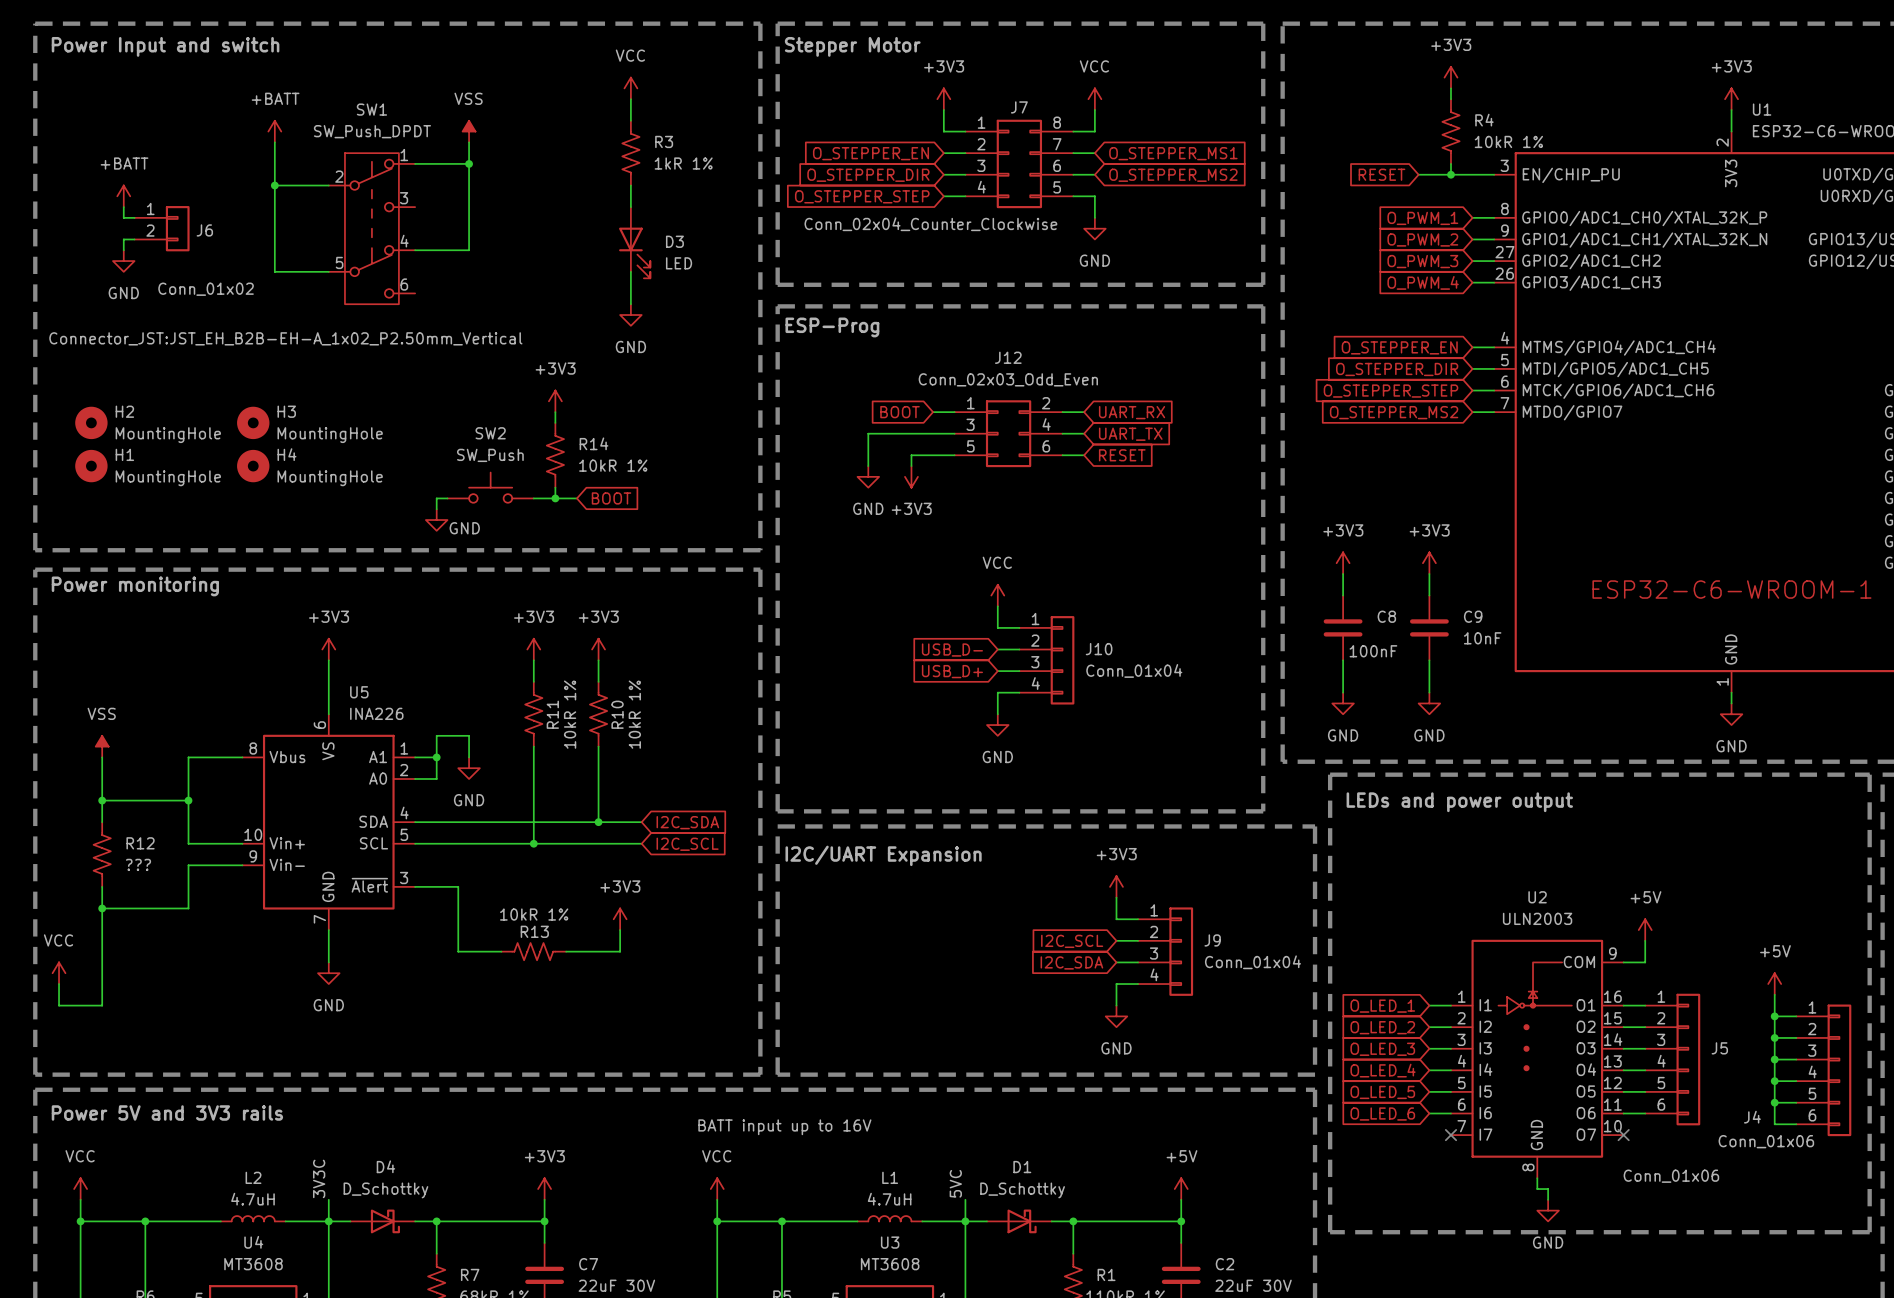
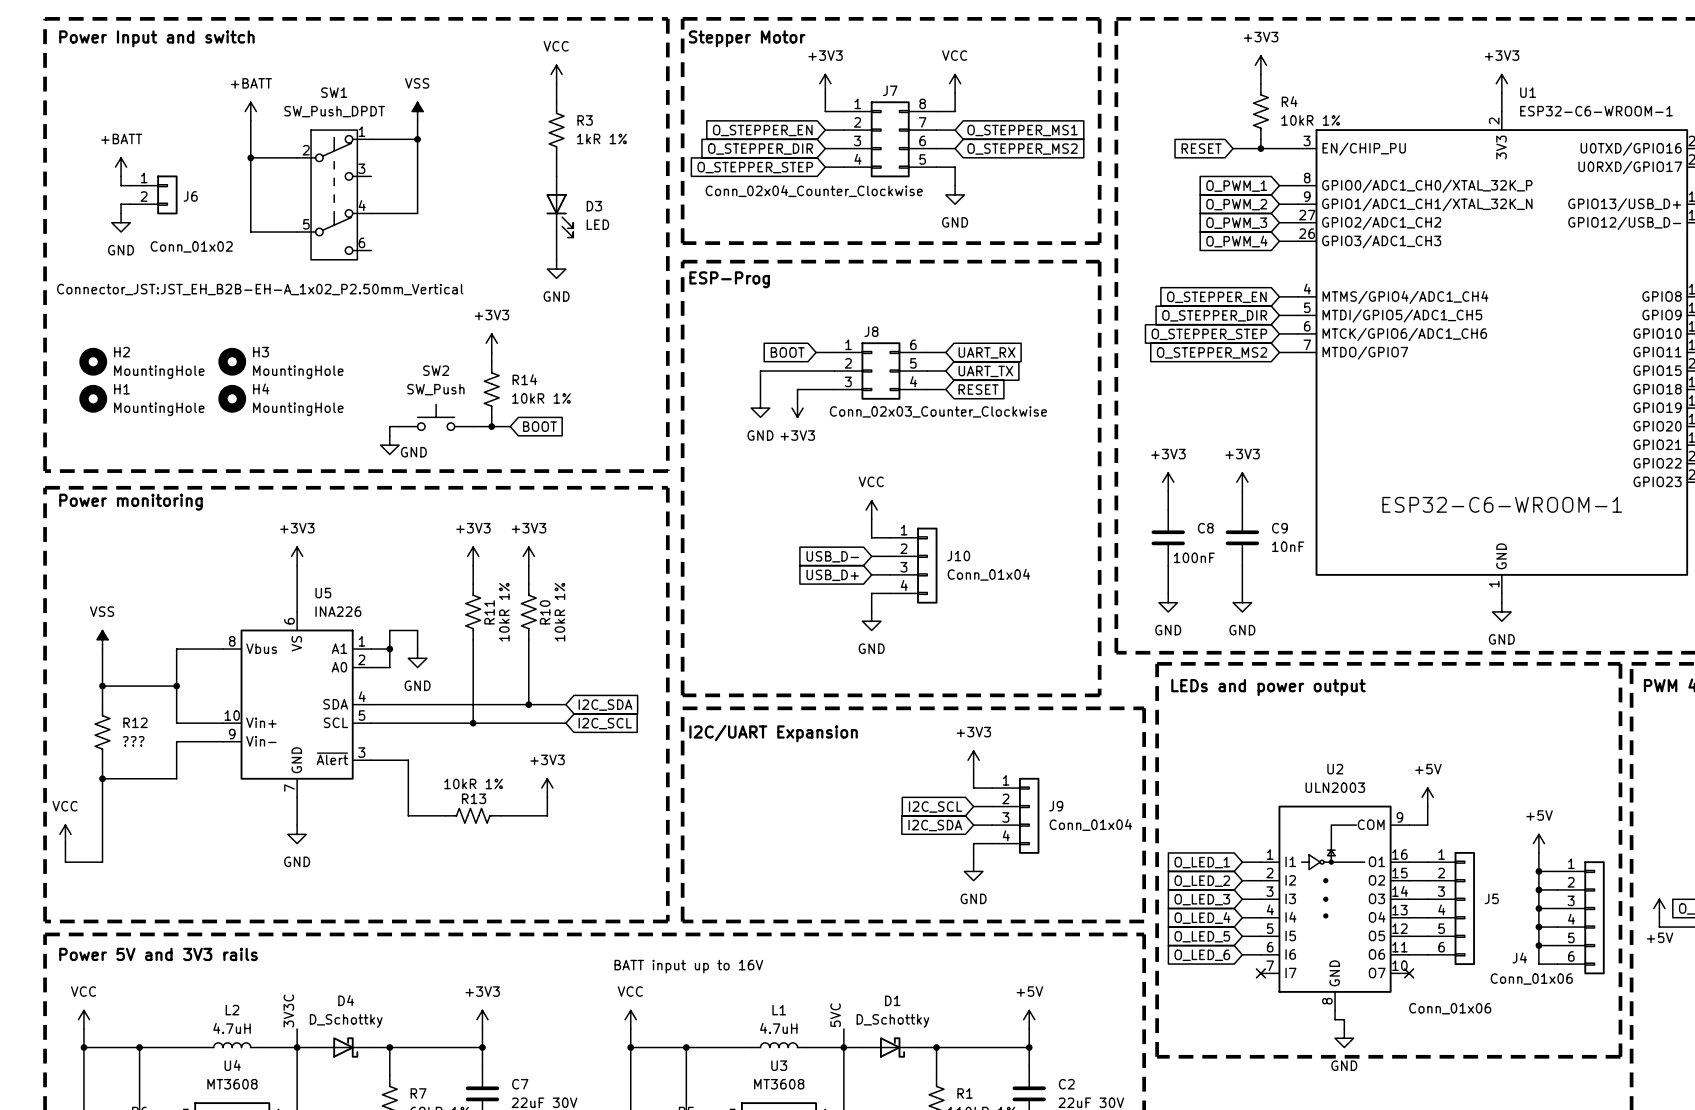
J12 name: J12 (1008, 357) -> J8 (871, 331)
J12 value: Conn_02x03_Odd_Even (1008, 379) -> Conn_02x03_Counter_Clockwise (938, 411)
J12 pin number: 2 (1046, 403) -> 6 (913, 344)
J12 pin number: 3 (970, 424) -> 2 (848, 363)
J12 pin number: 4 (1046, 424) -> 5 (913, 363)
J12 pin number: 5 (970, 446) -> 3 (848, 381)
J12 pin number: 6 (1046, 446) -> 4 (913, 381)

